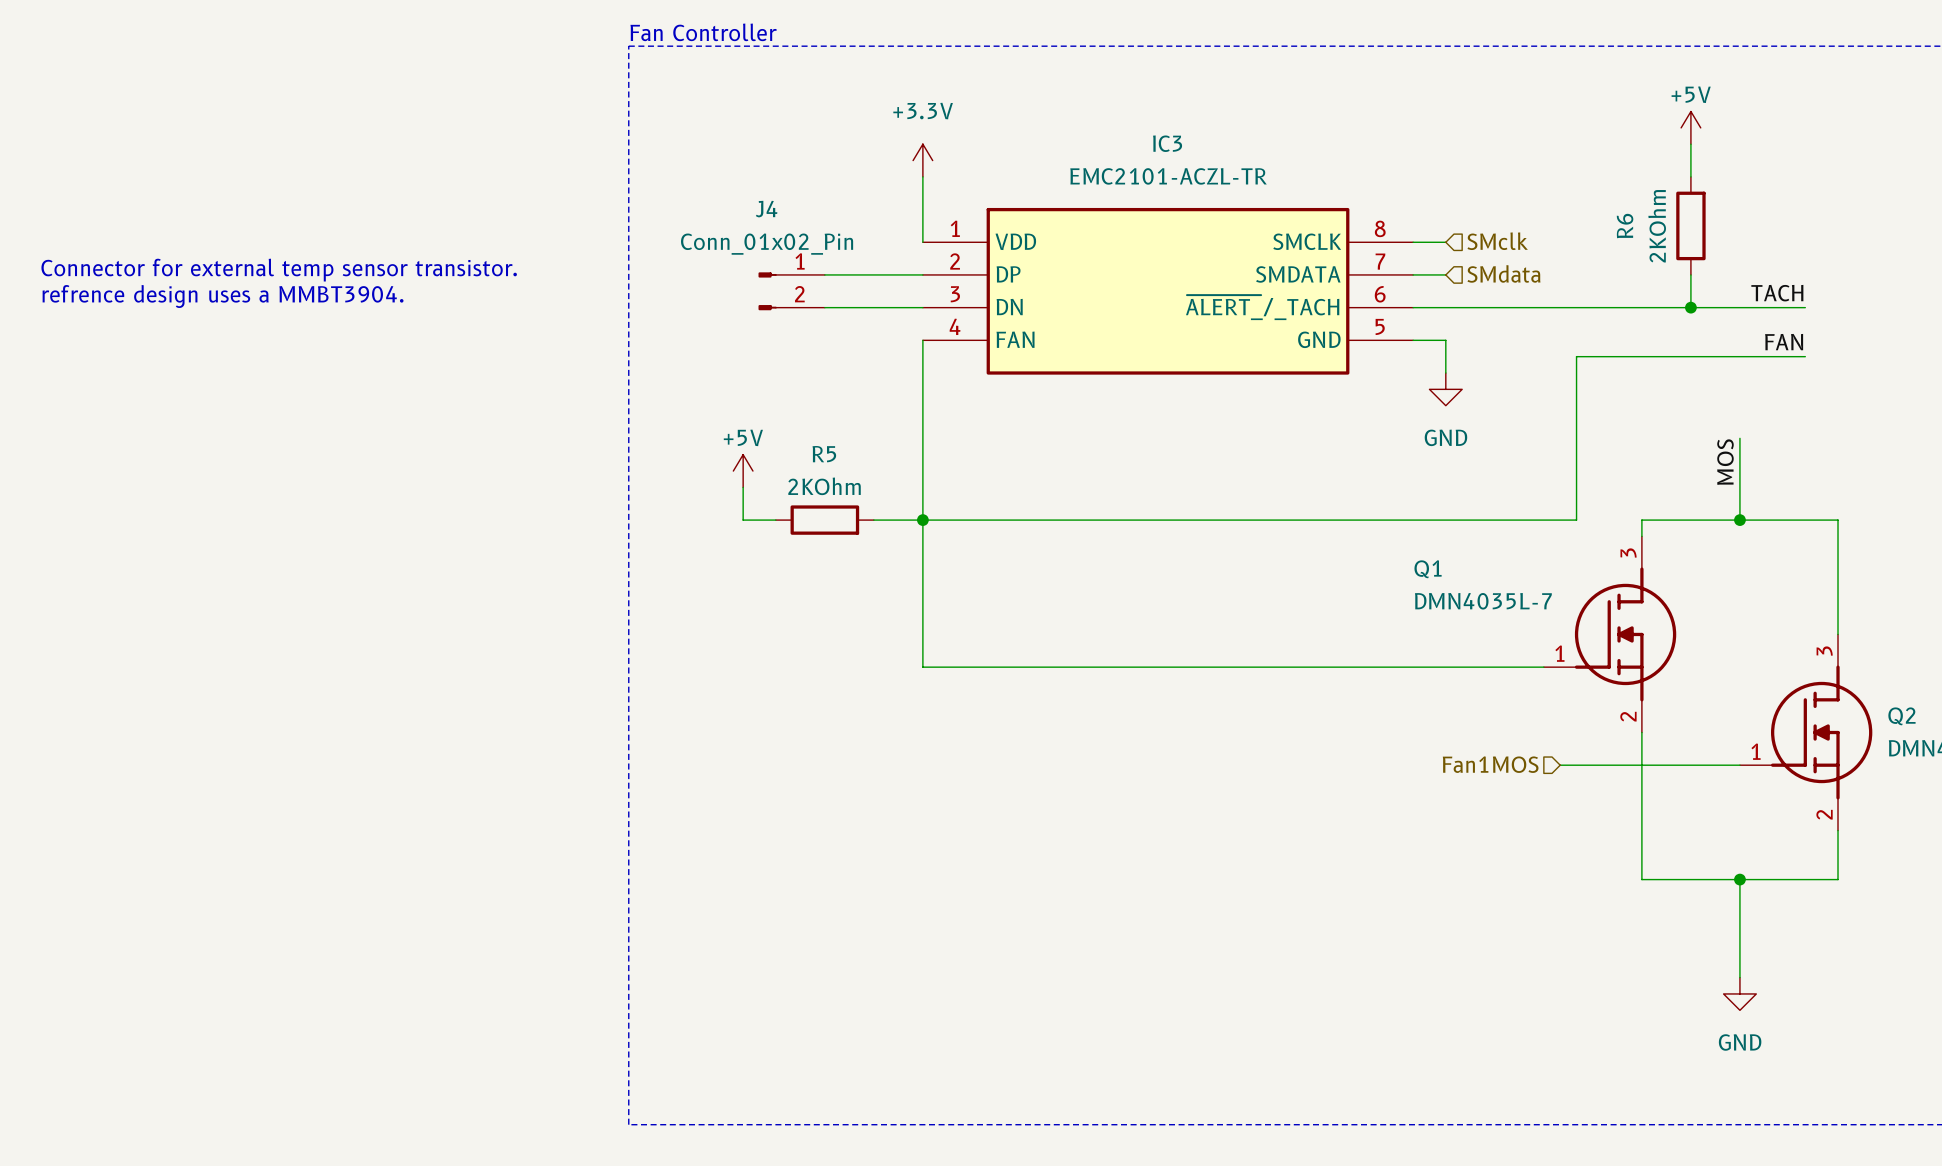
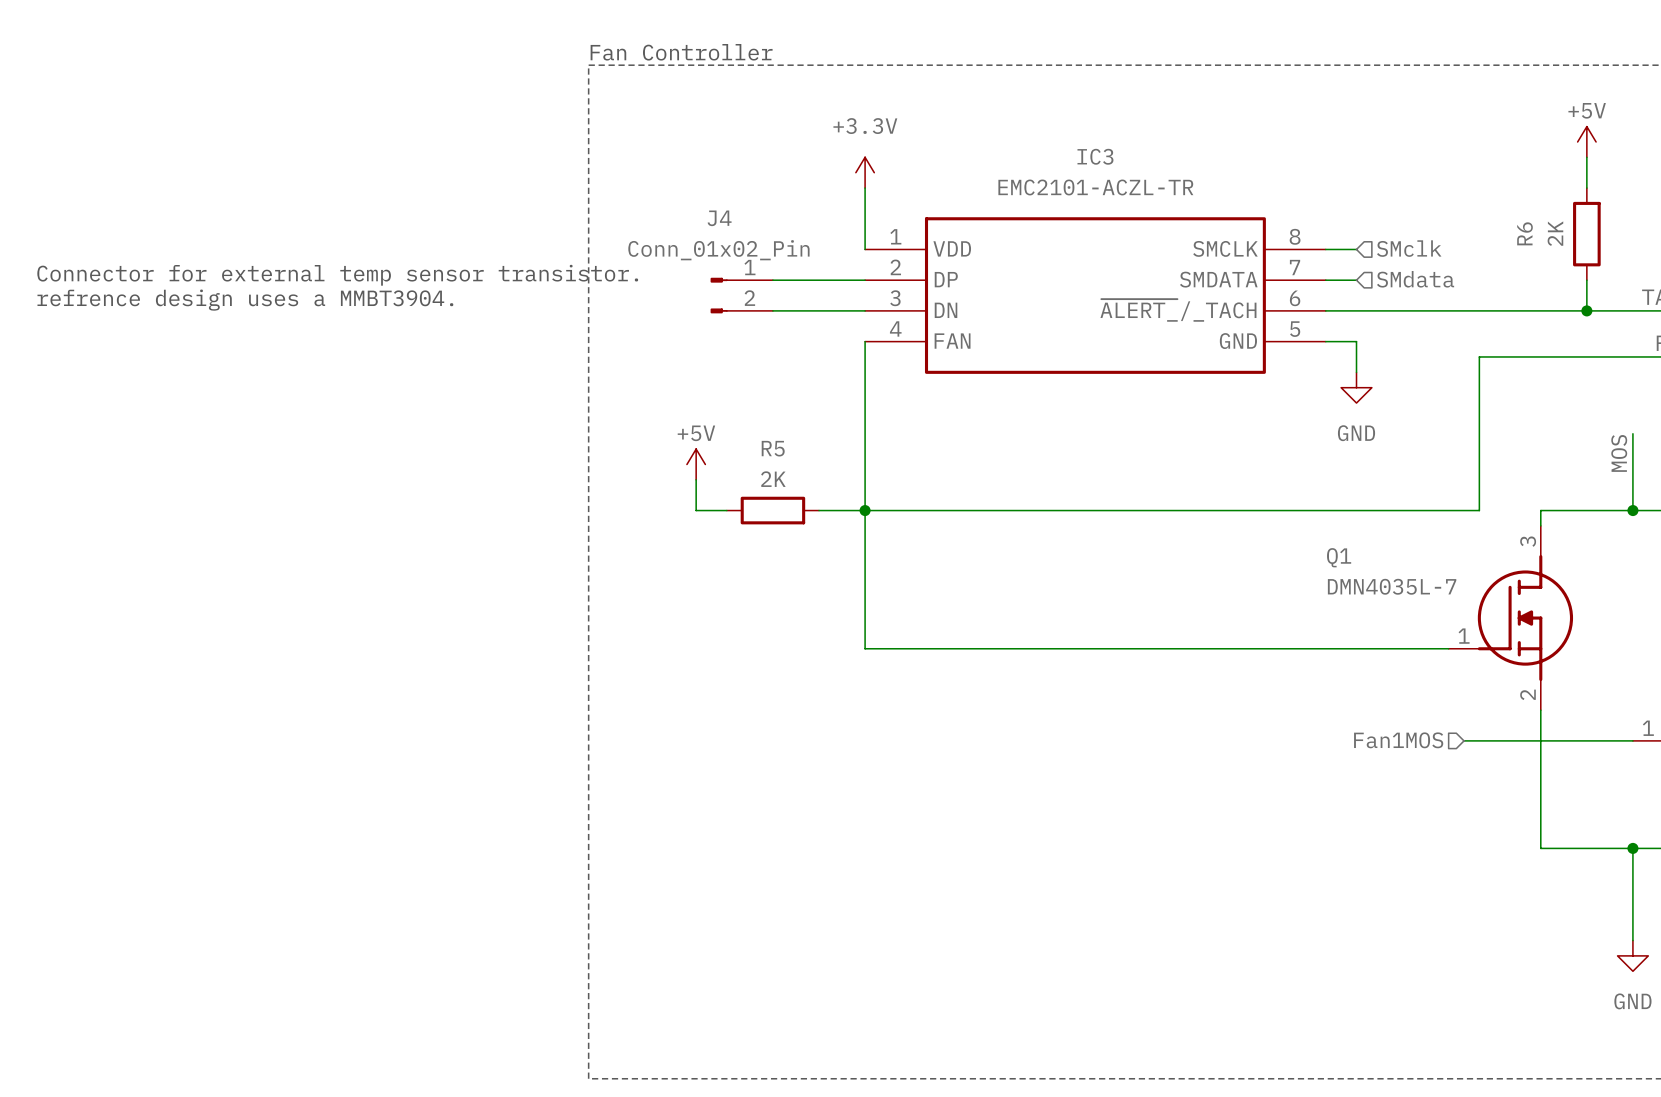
R6 value: 2KOhm (1657, 226) -> 2K (1555, 233)
R5 value: 2KOhm (824, 486) -> 2K (773, 479)

